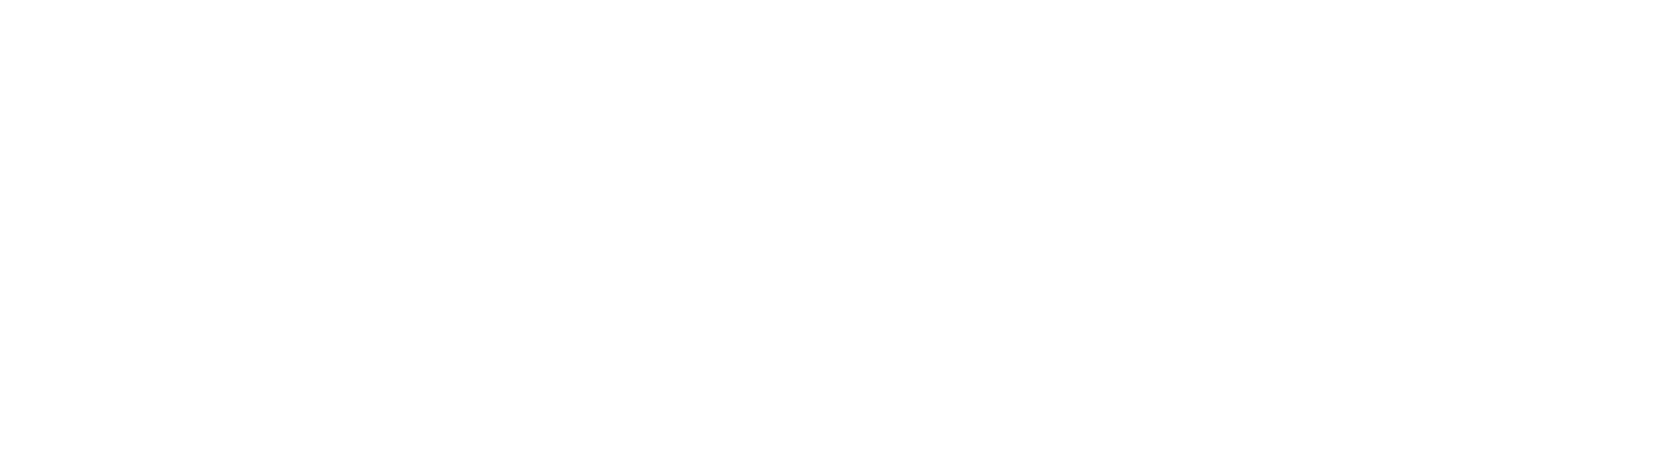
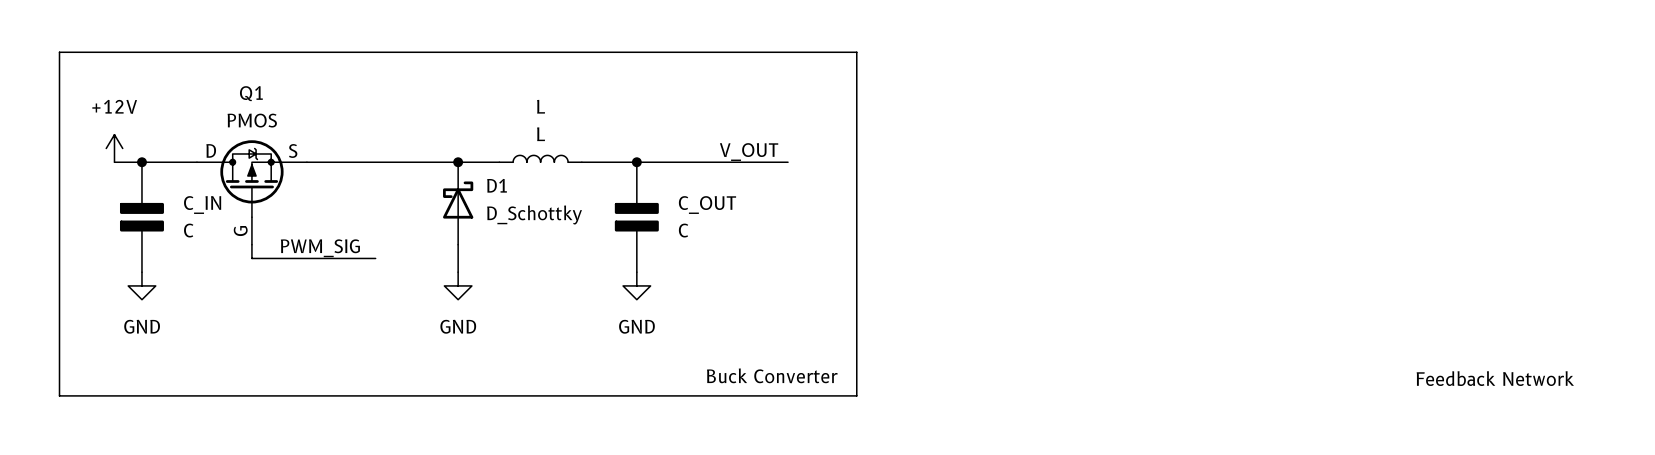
line: none -> (59, 52) (856, 52) (856, 395) (59, 395) (59, 52)
power symbol: none -> +12V (114, 148)
label: none -> V_OUT (749, 152)
L: none -> L (540, 158)
wire: none -> (114, 162) (196, 162)
junction: none -> (141, 162)
wire: none -> (306, 162) (499, 162)
junction: none -> (458, 162)
wire: none -> (581, 162) (788, 162)
junction: none -> (636, 162)
Q1: none -> PMOS (251, 192)
D1: none -> D_Schottky (458, 203)
C_IN: none -> C (141, 217)
C_OUT: none -> C (636, 217)
wire: none -> (251, 244) (251, 258) (375, 258)
wire: none -> (458, 244) (458, 272)
label: none -> PWM_SIG (320, 248)
power symbol: none -> GND (141, 285)
power symbol: none -> GND (458, 285)
power symbol: none -> GND (636, 285)
text: none -> Buck Converter (772, 375)
text: none -> Feedback Network (1495, 378)

